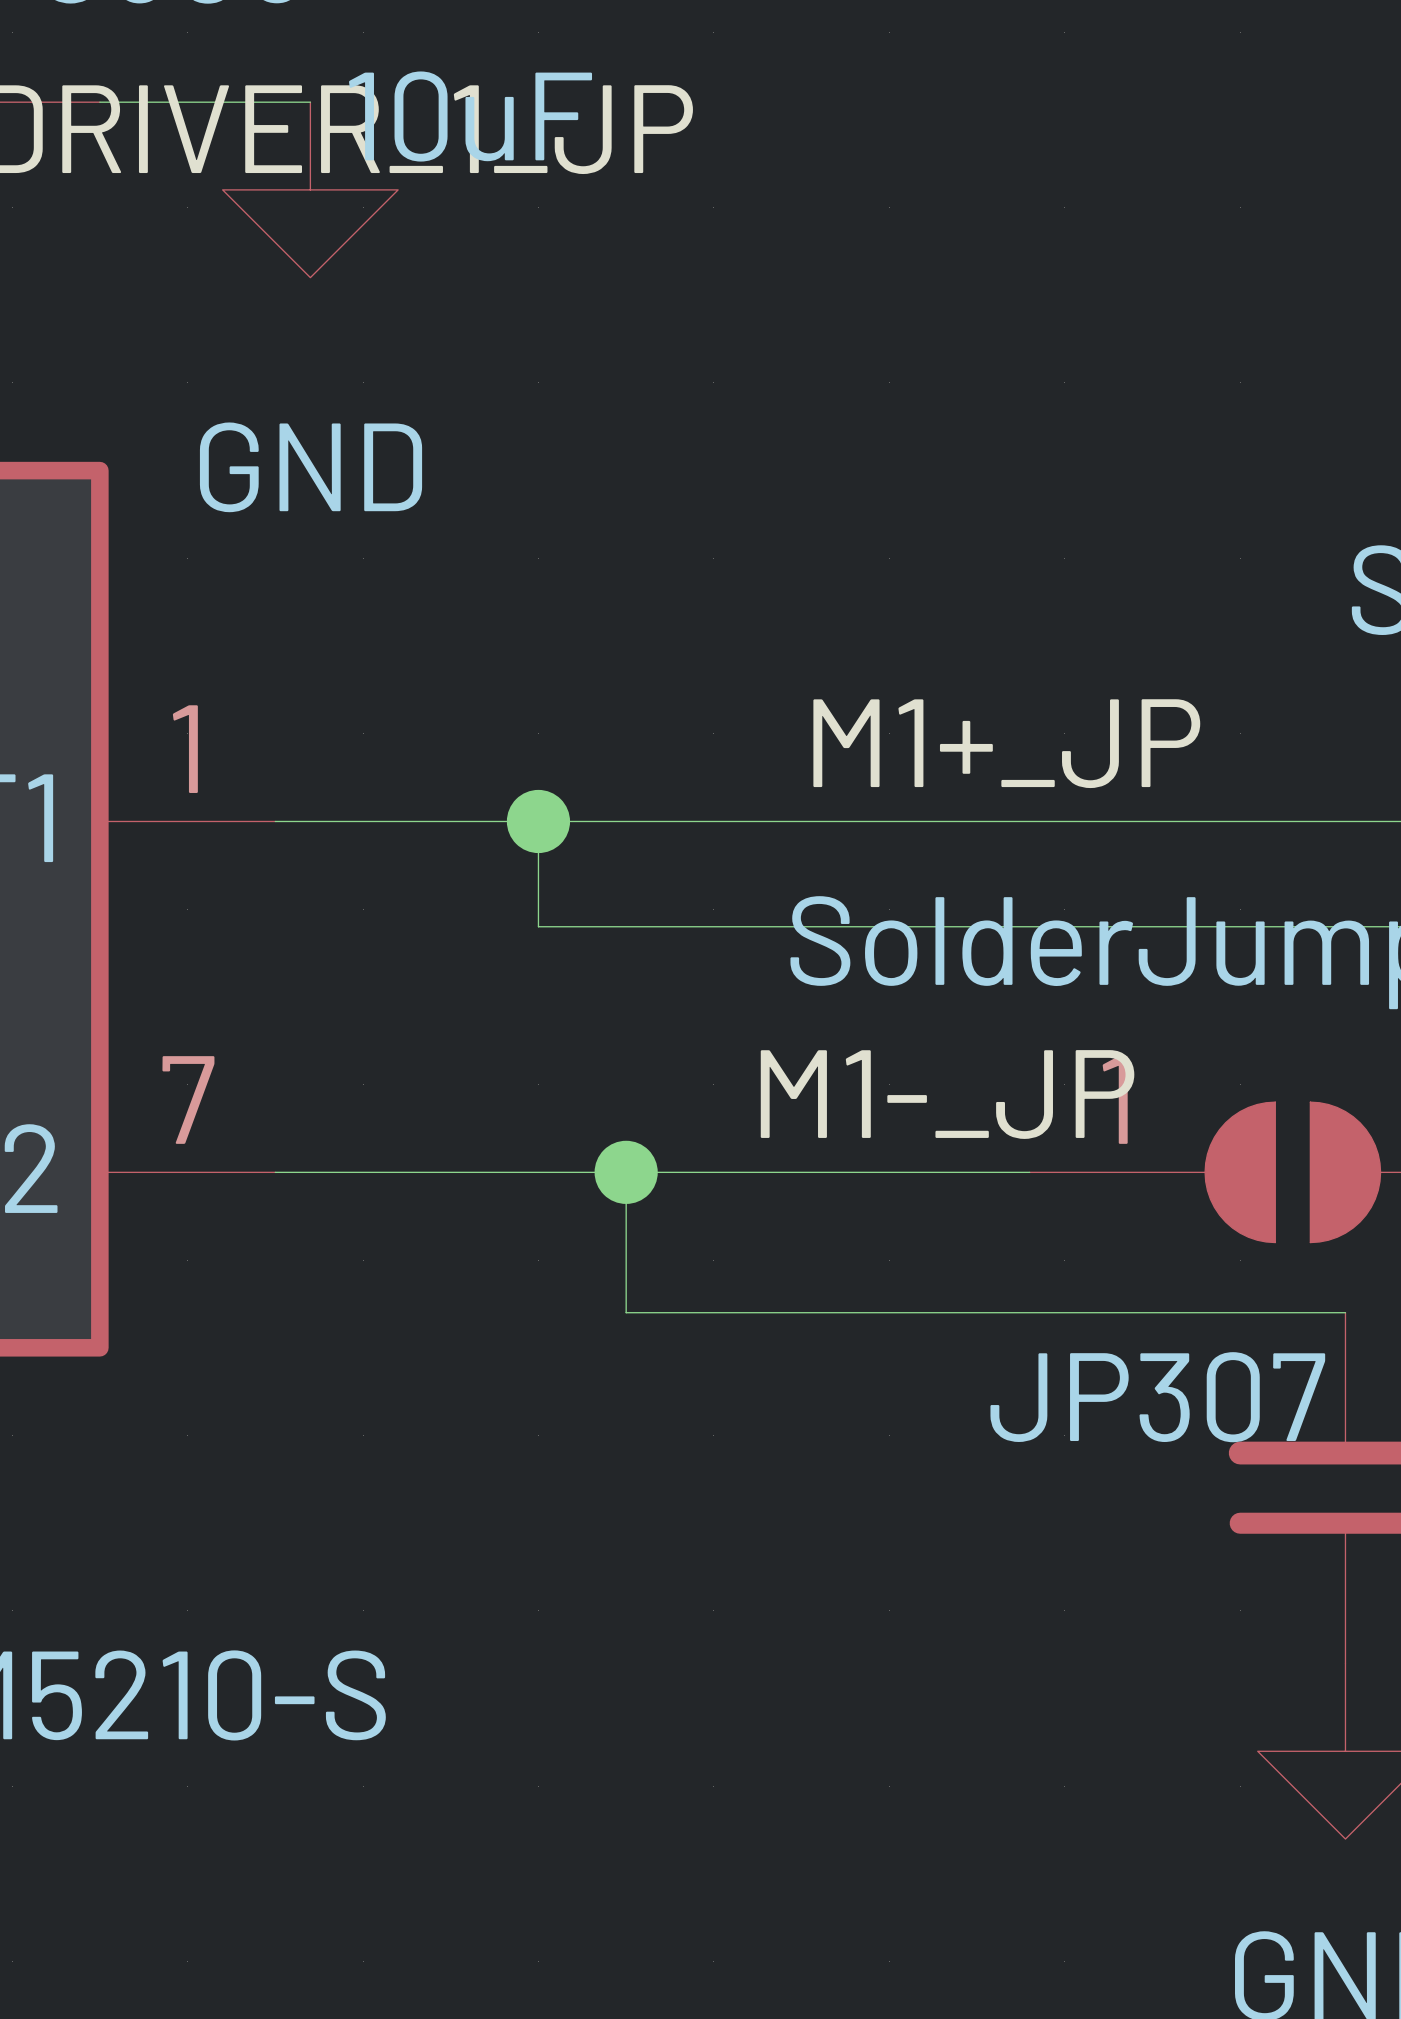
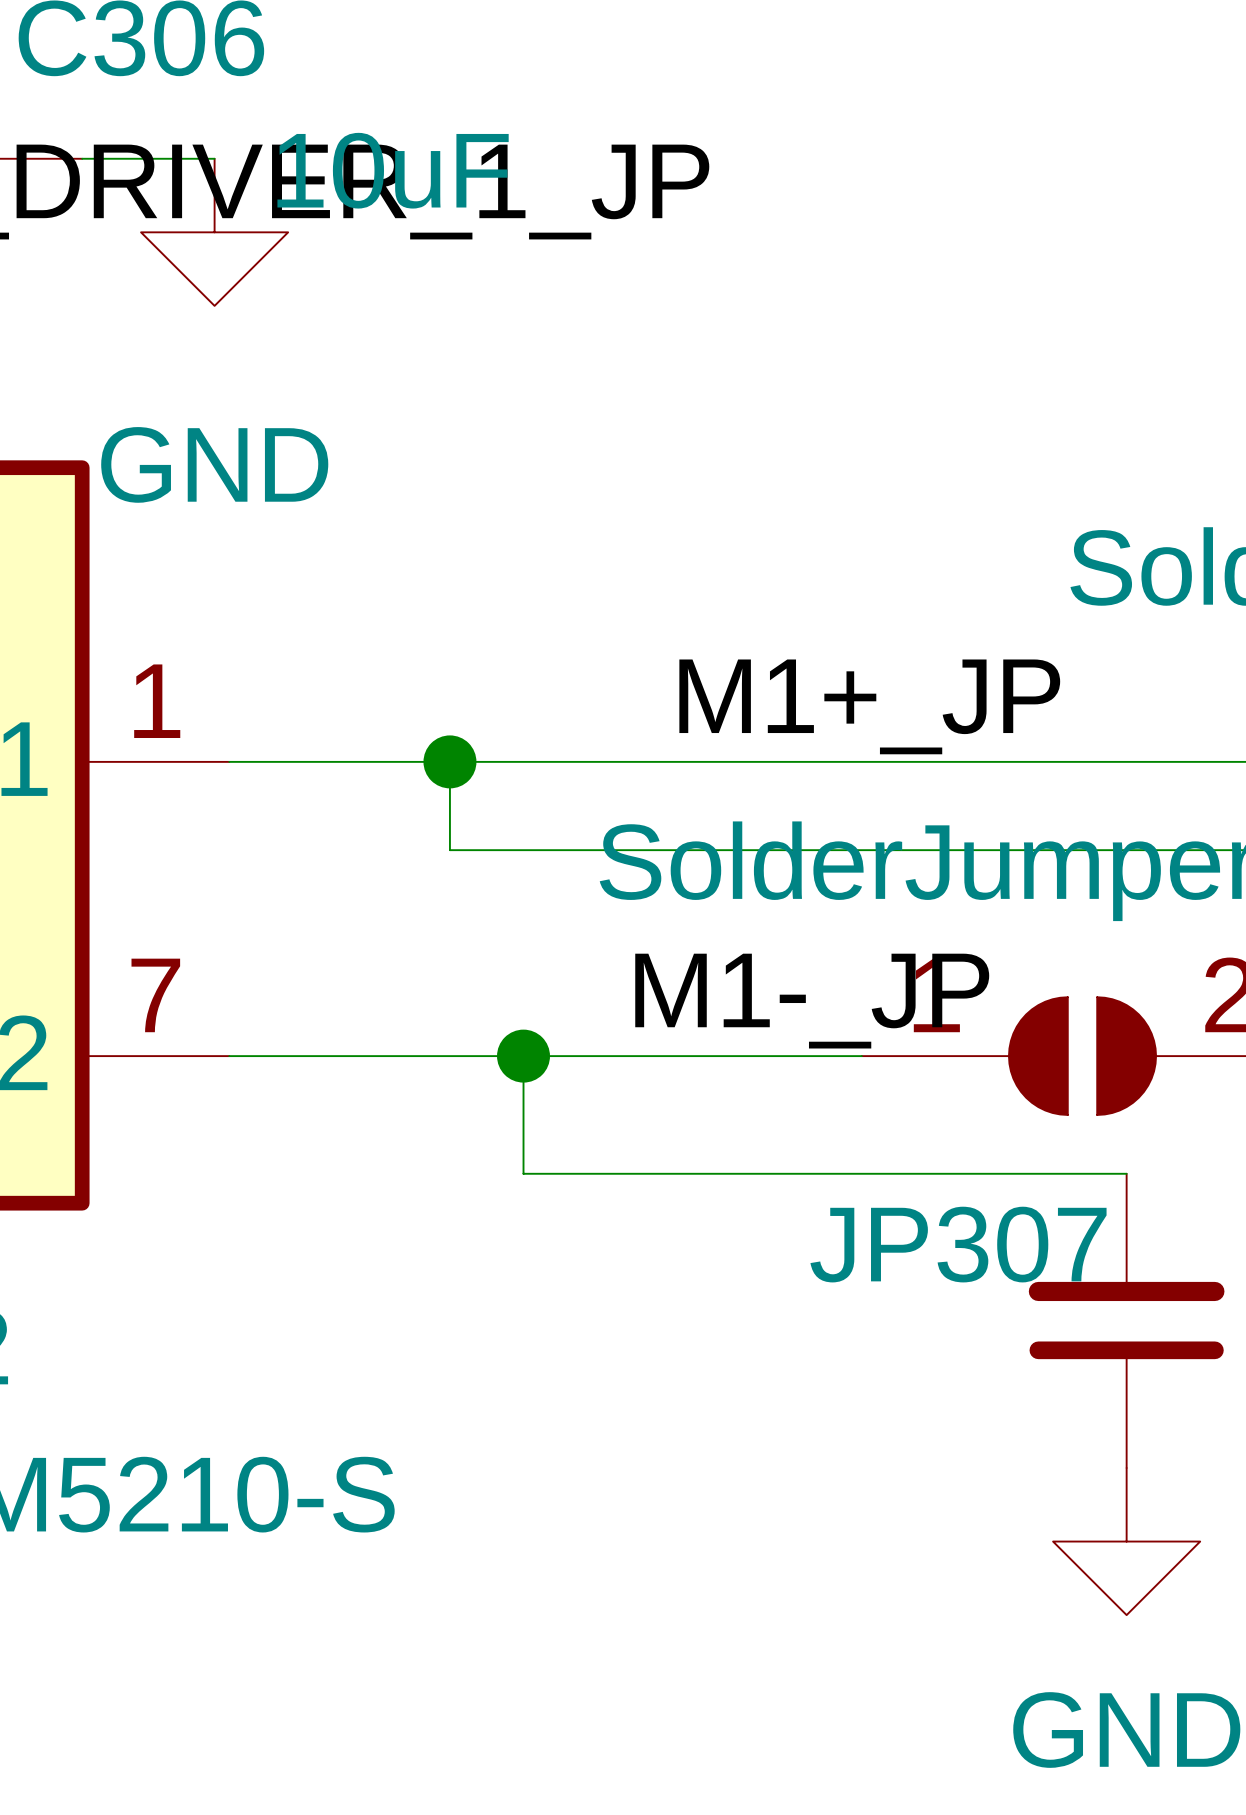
wire: (257, 102) (310, 102) -> none
power symbol position: GND (310, 189) -> GND (214, 232)

